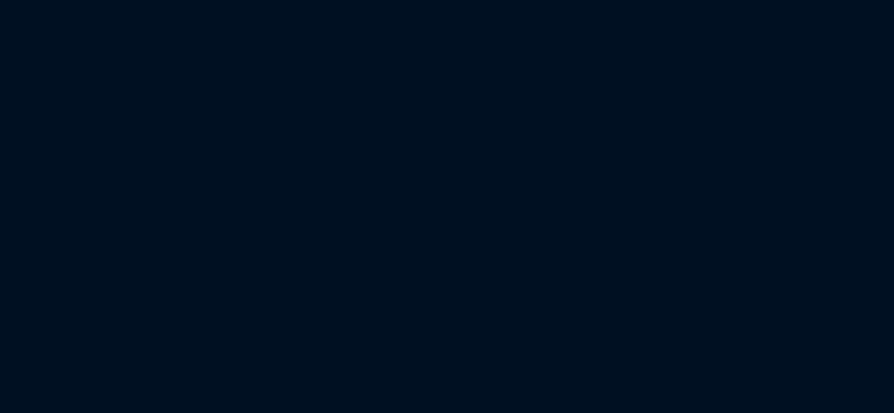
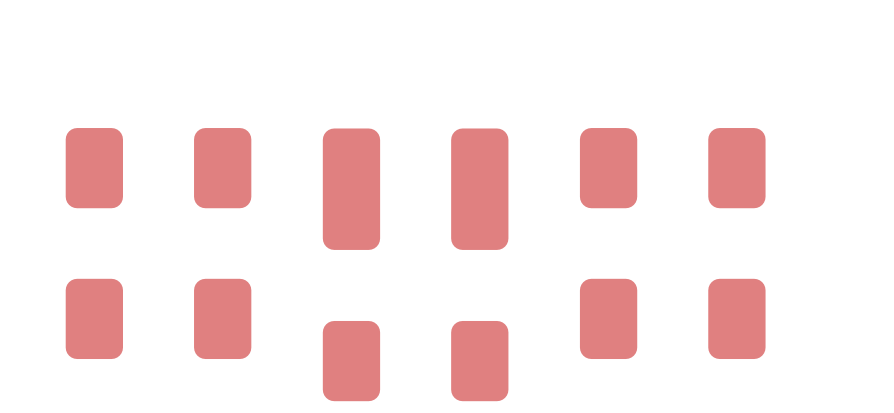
part: none -> (158, 168)
part: none -> (672, 168)
part: none -> (415, 189)
part: none -> (158, 318)
part: none -> (672, 318)
part: none -> (415, 361)

